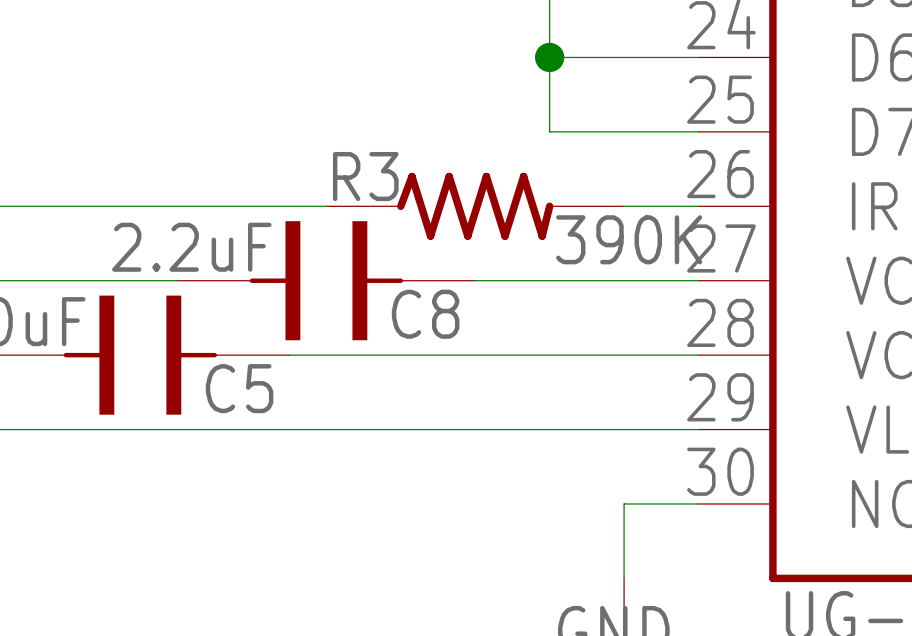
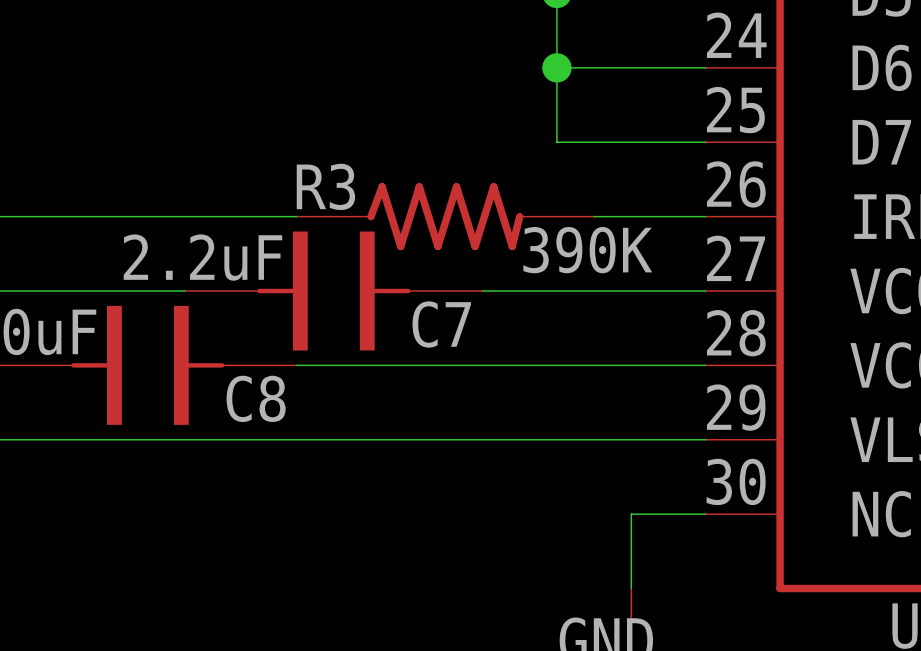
R3 position: (475, 206) -> (445, 216)
C8 name: C8 (425, 314) -> C7 (441, 324)
C5 name: C5 (239, 388) -> C8 (256, 398)

